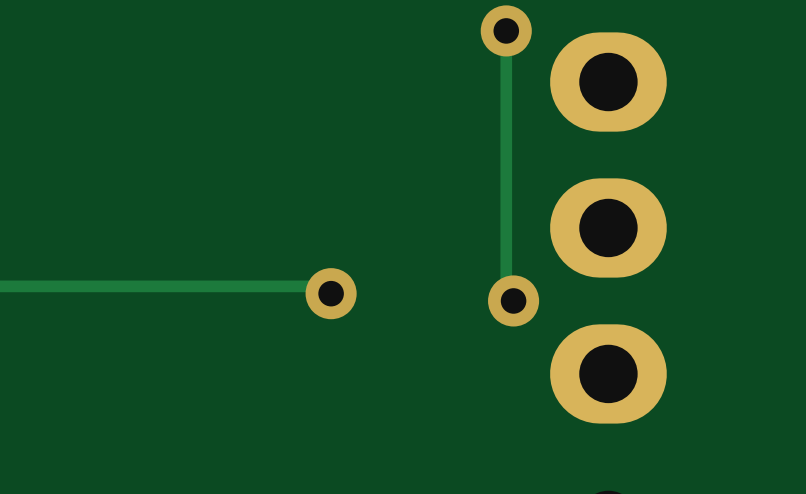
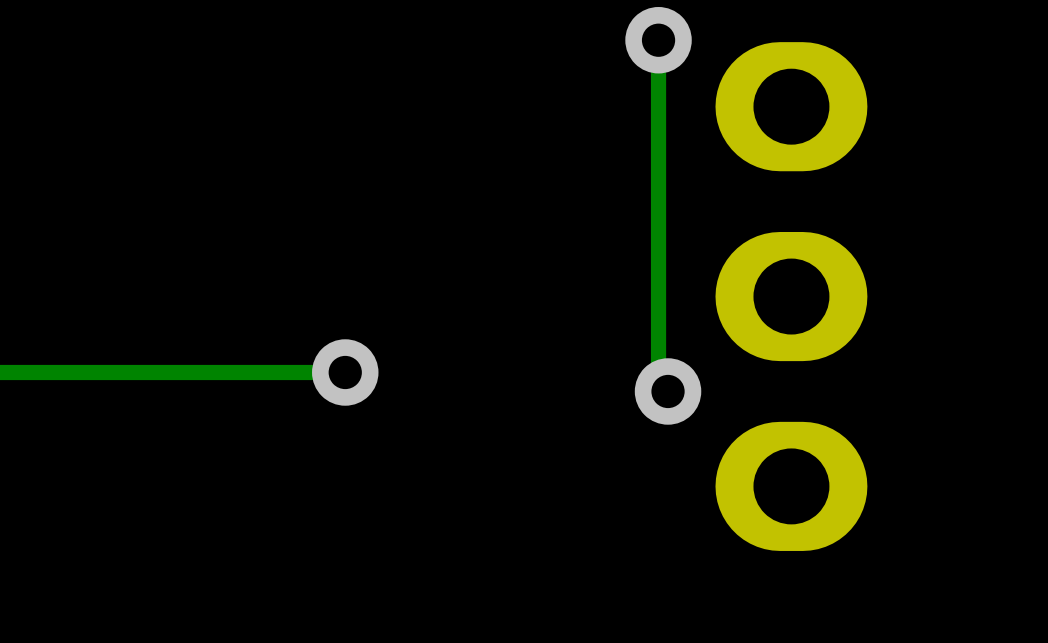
track: (265, 286) (323, 286) (331, 293) -> none
via position: (331, 293) -> (345, 372)

